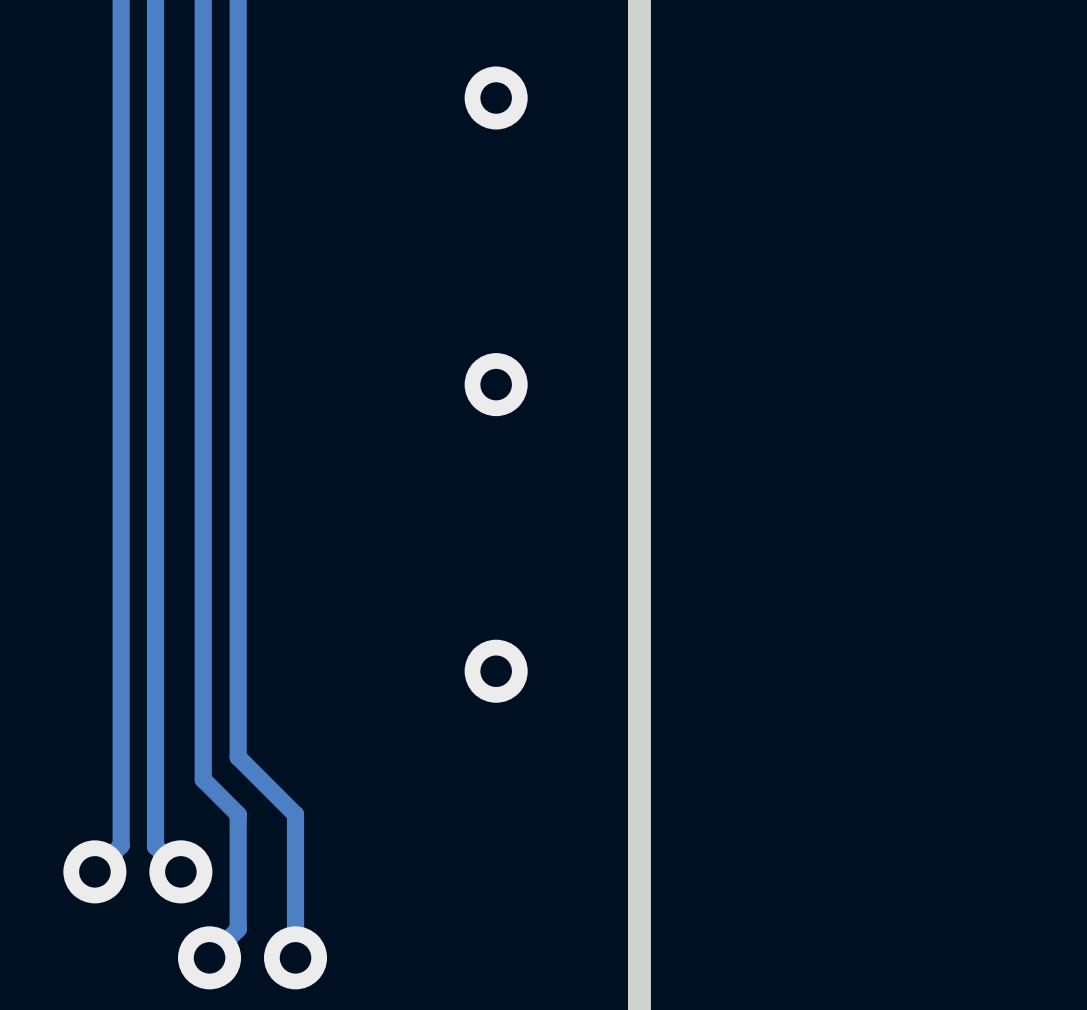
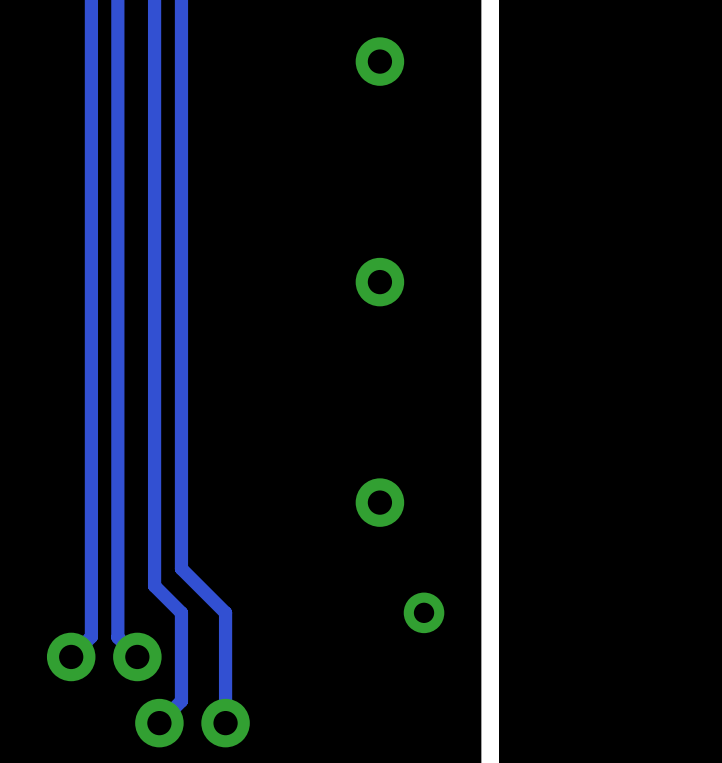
via: none -> (424, 612)

